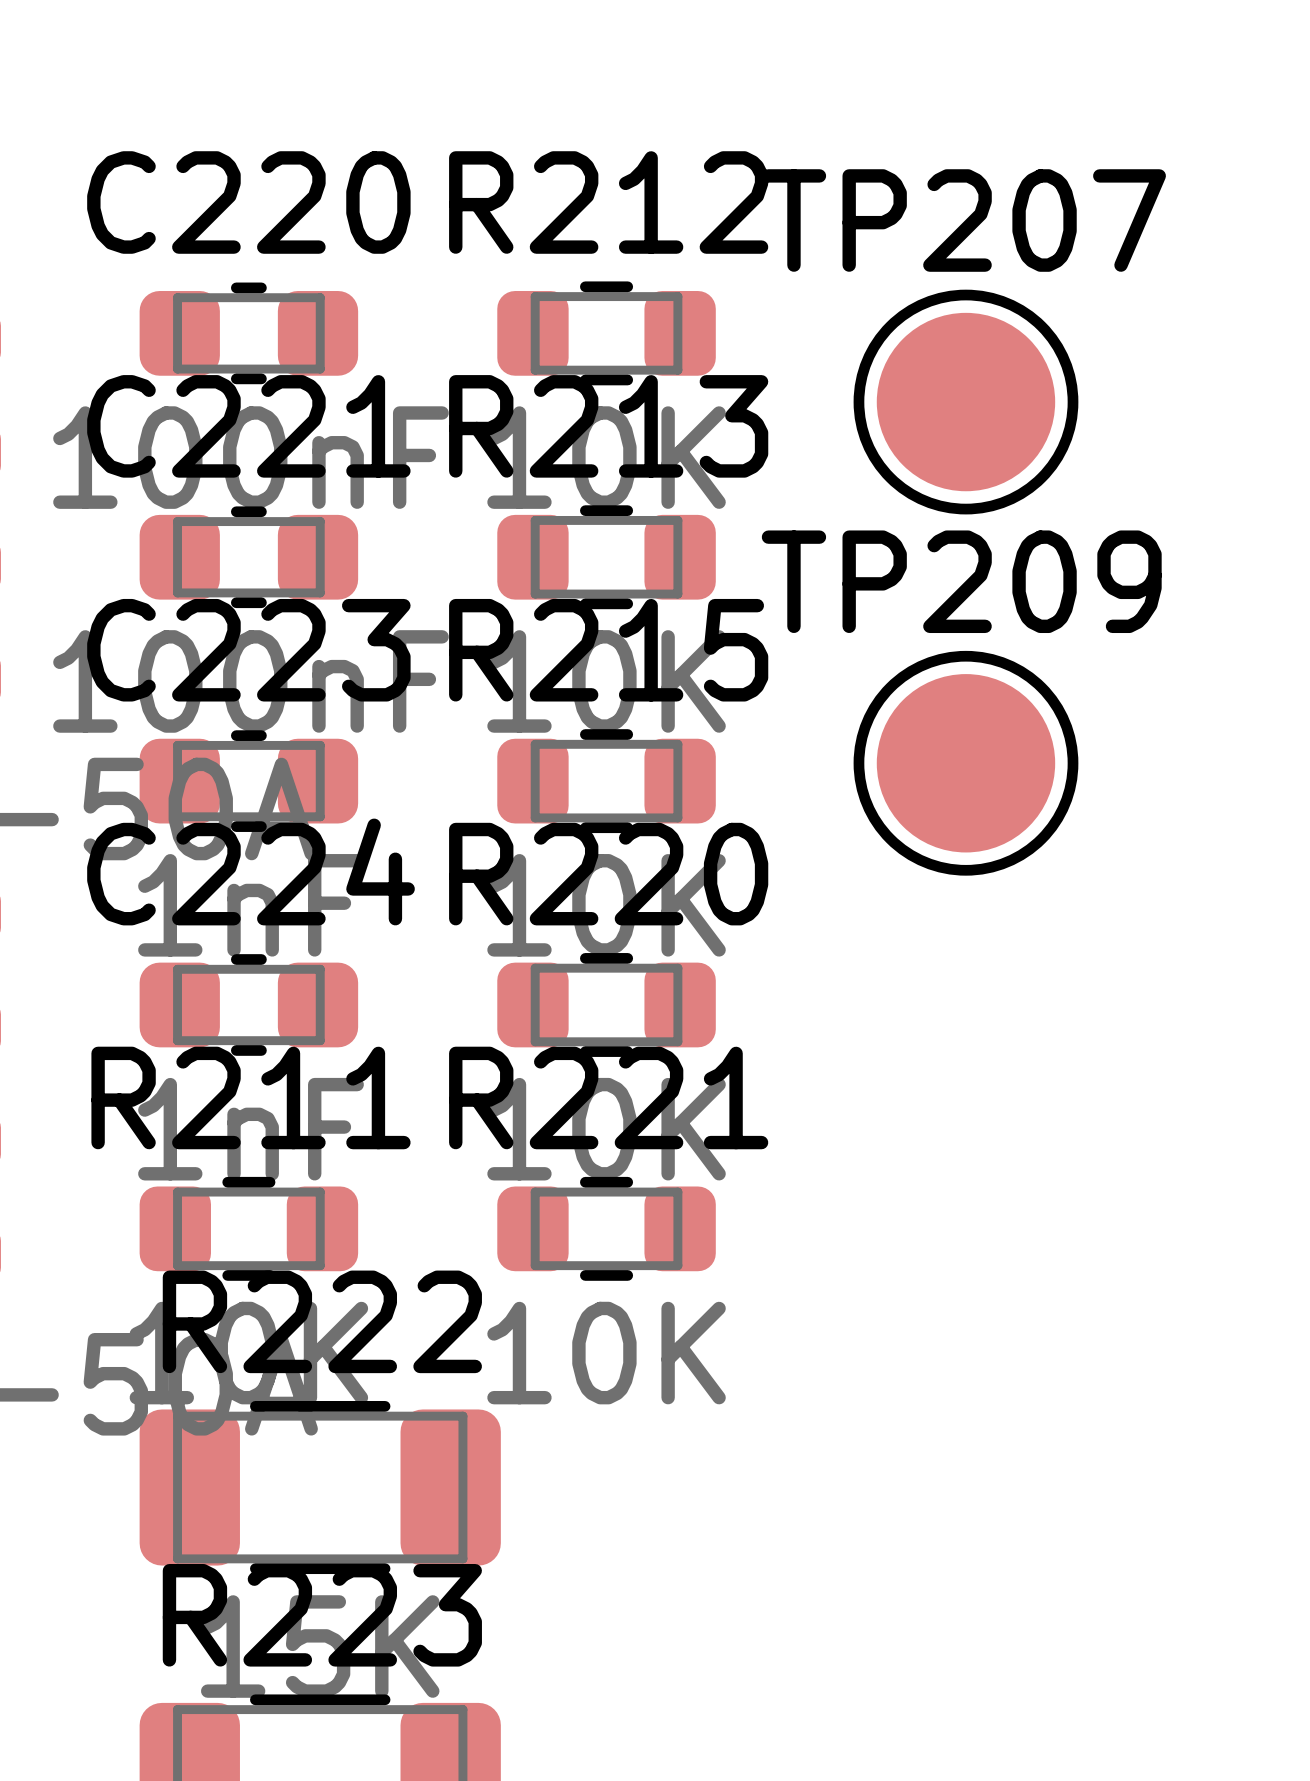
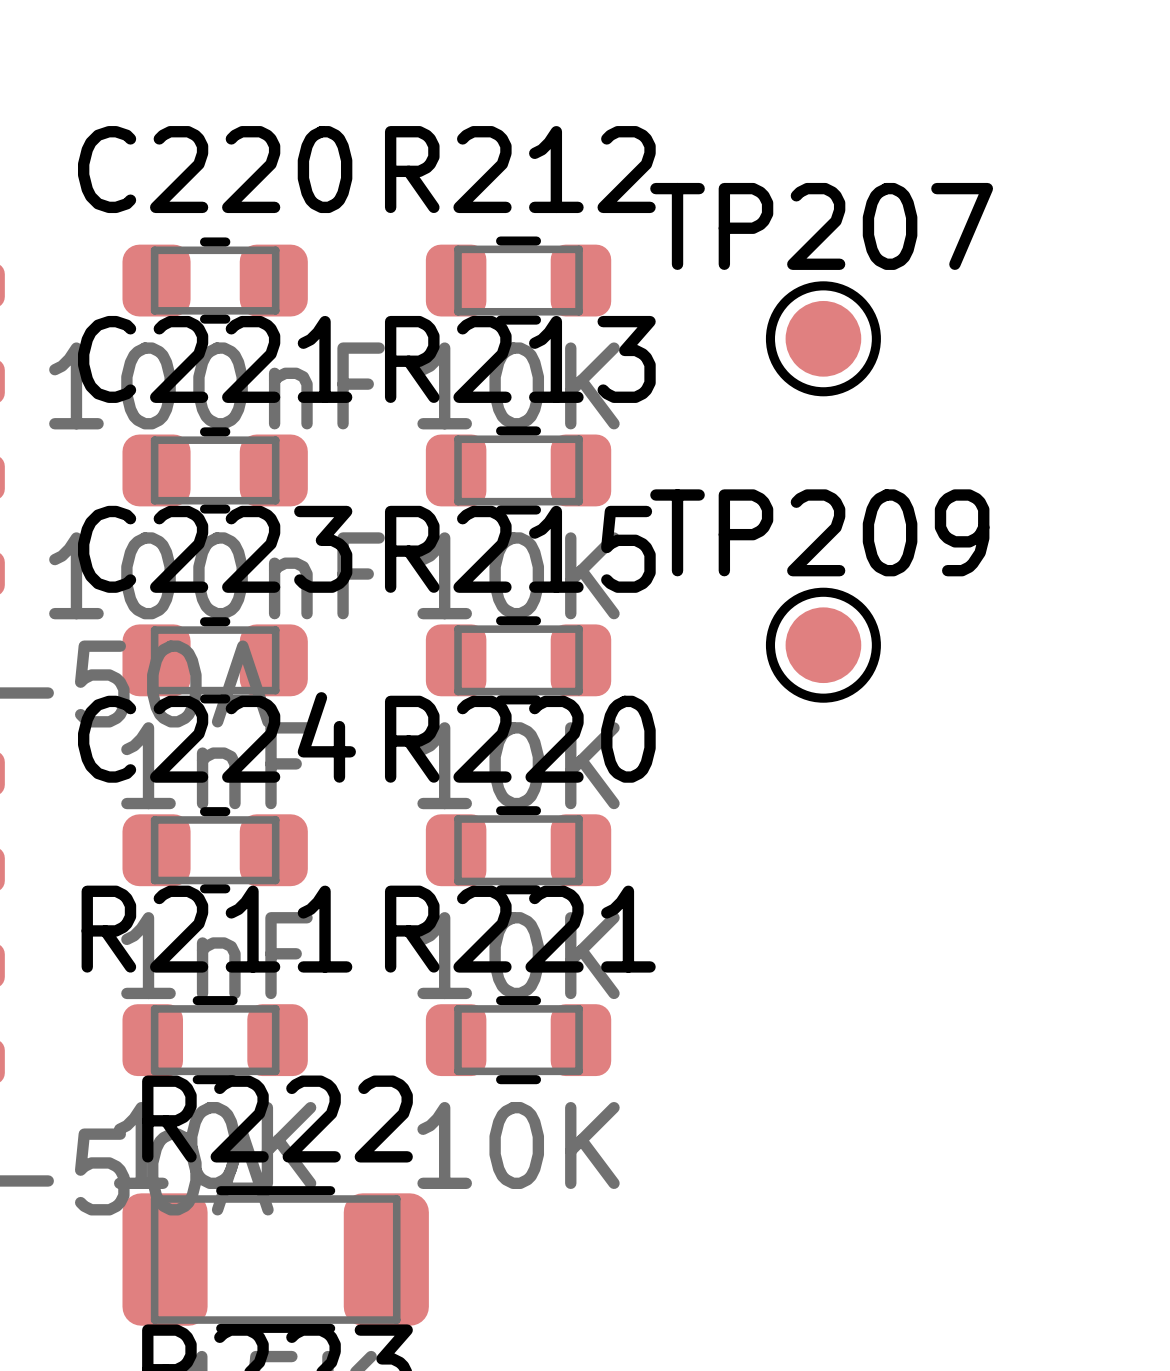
TP207 name position: TP207 (963, 220) -> TP207 (821, 226)
TP207 footprint: [853, 289, 1079, 515] -> [765, 281, 881, 397]
TP209 name position: TP209 (961, 581) -> TP209 (819, 532)
TP209 footprint: [853, 650, 1079, 876] -> [765, 587, 881, 703]

